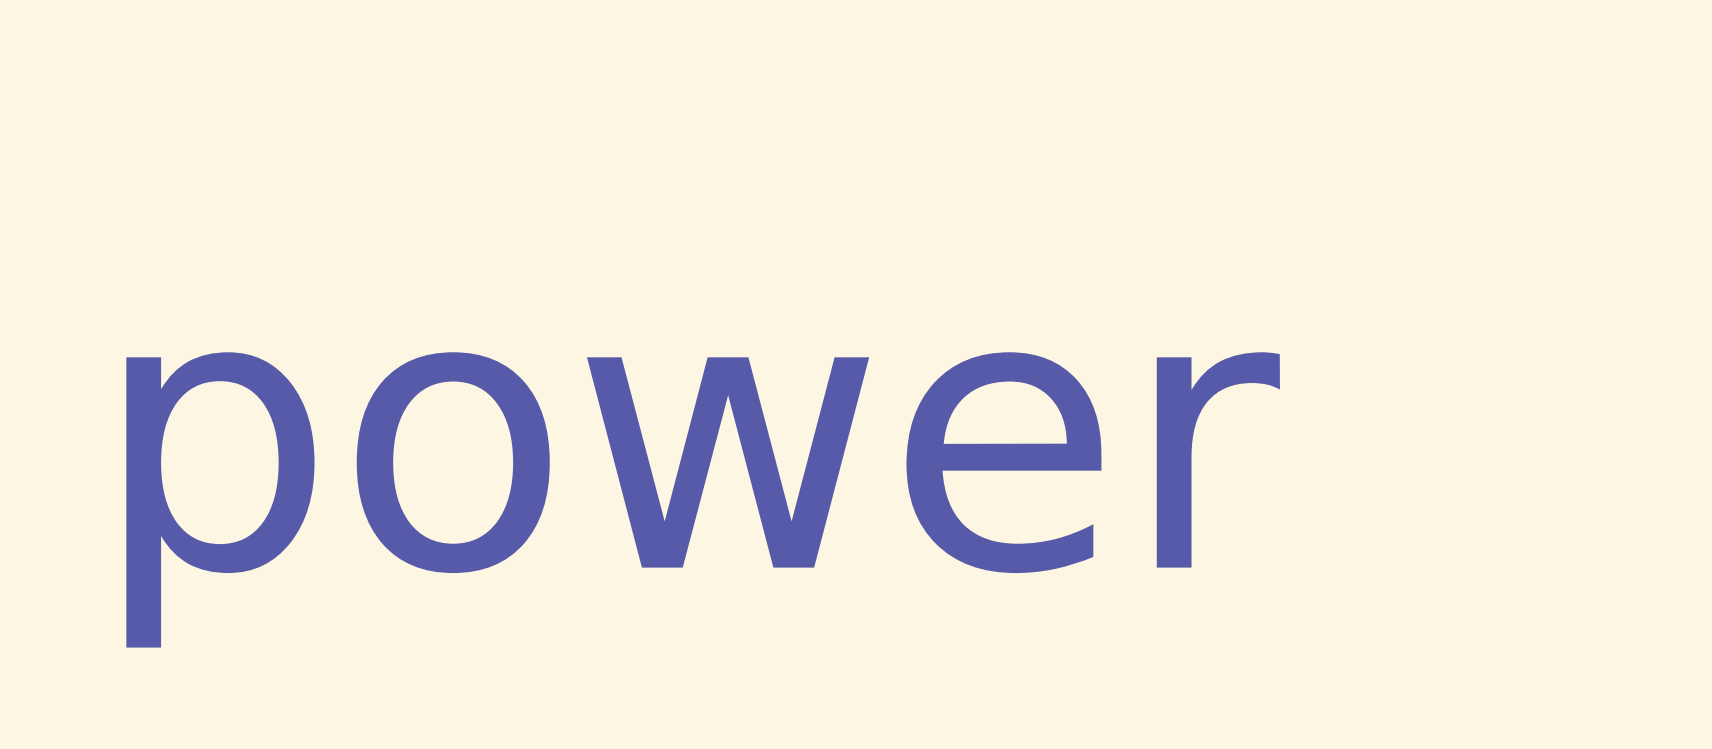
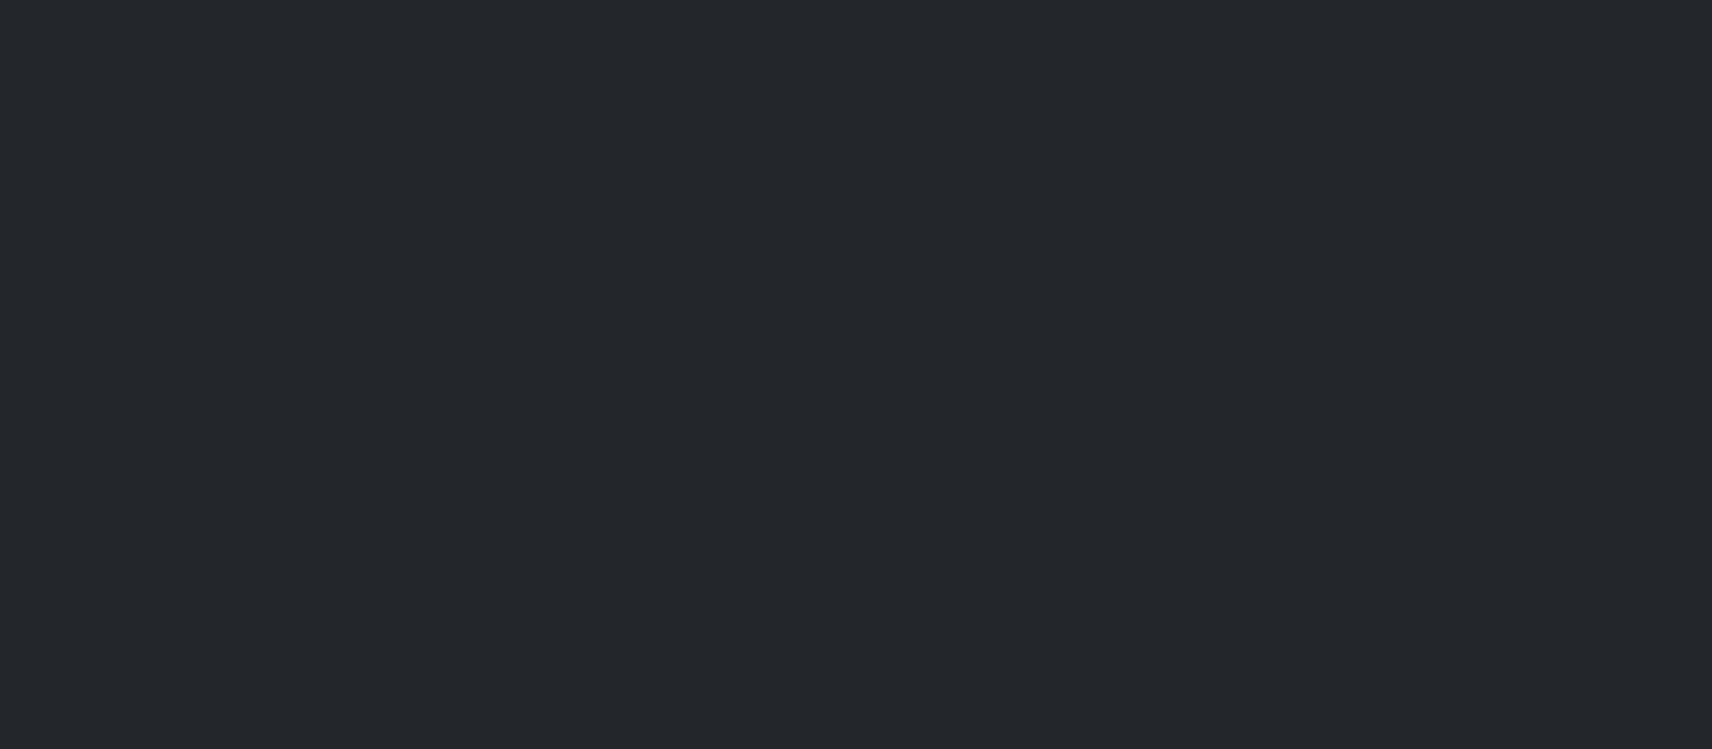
text: power (703, 499) -> none

